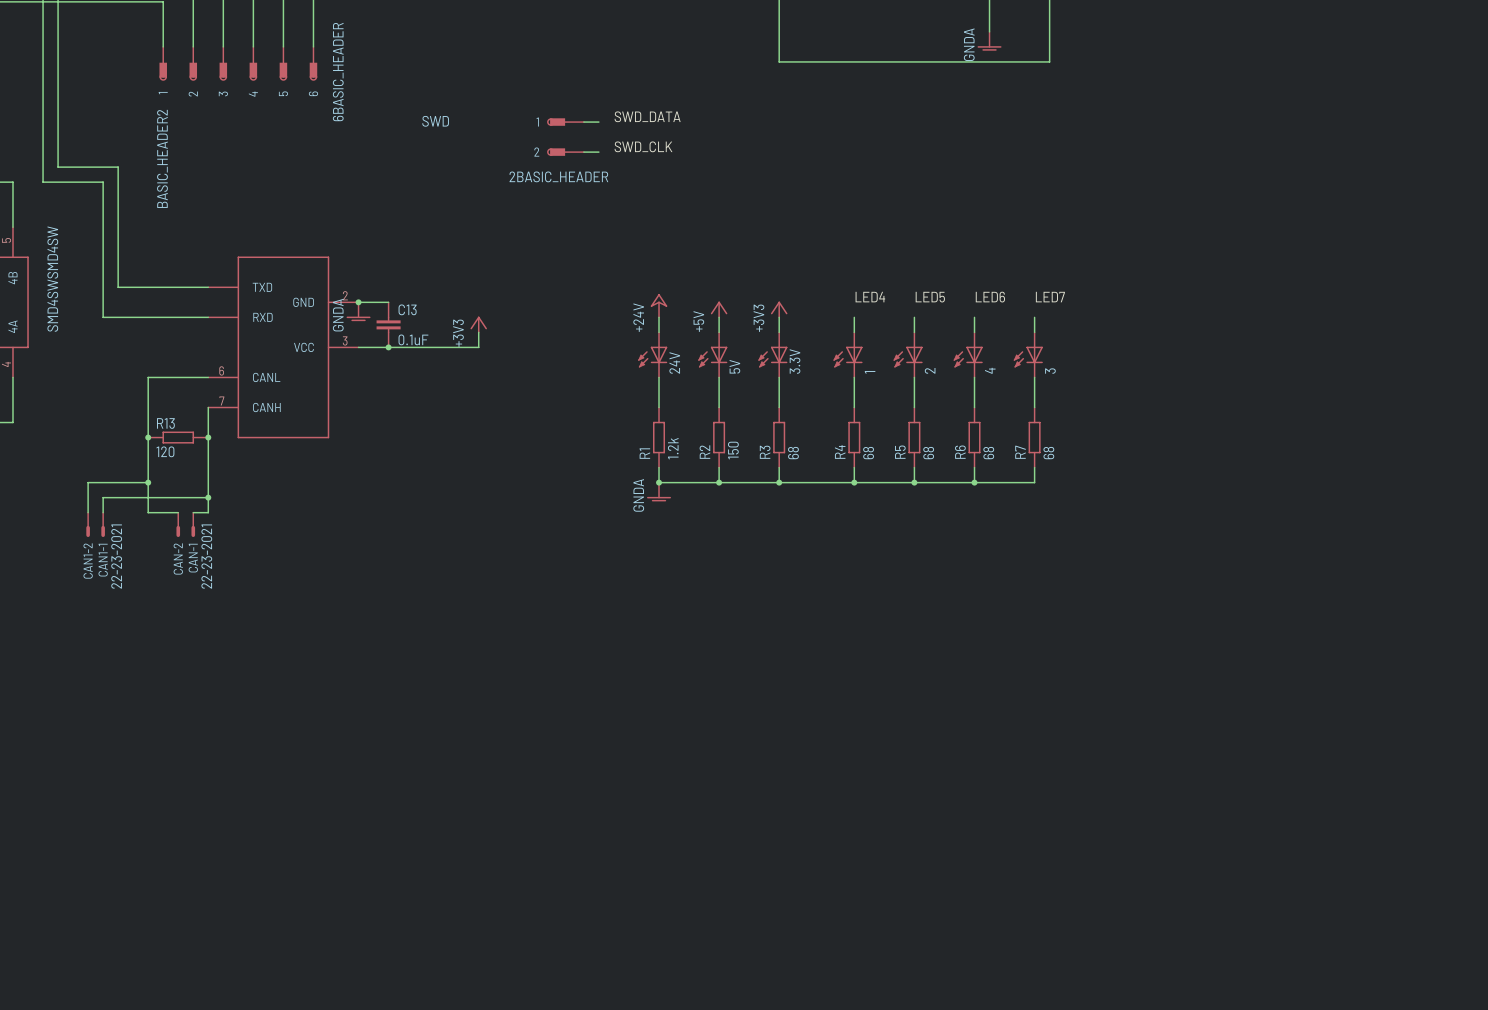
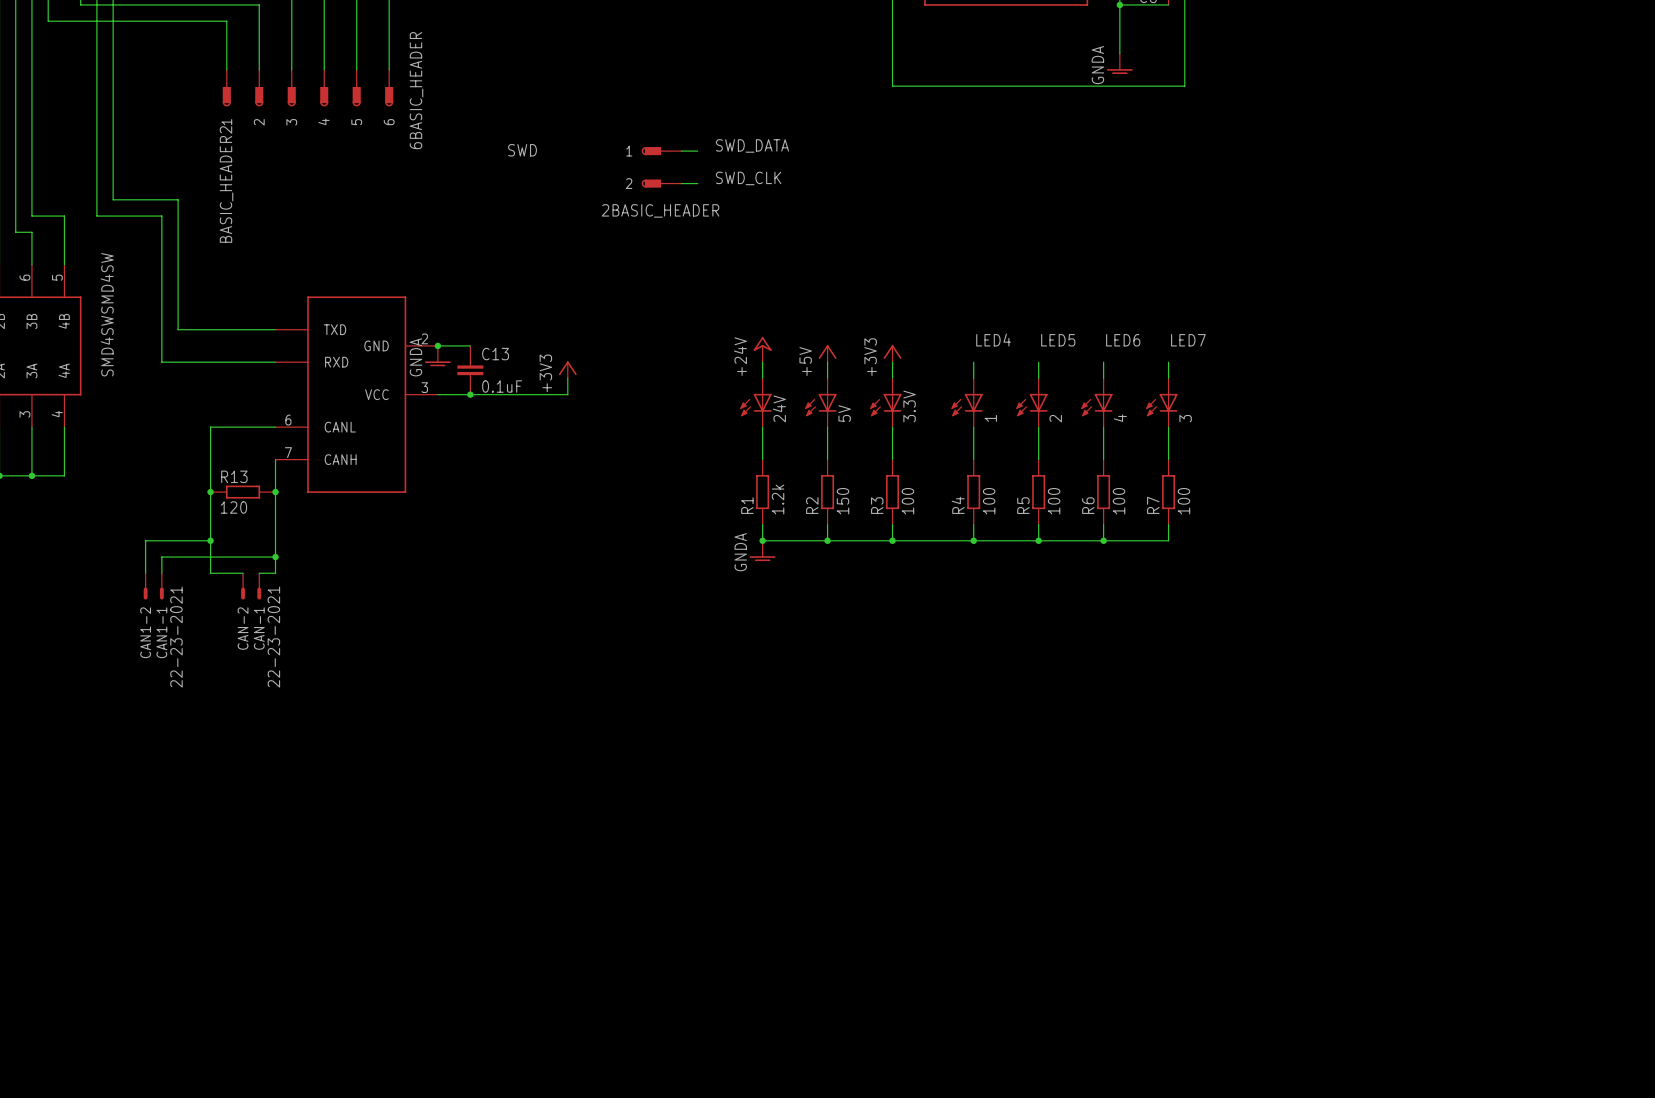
R3 value: 68 (793, 453) -> 100 (907, 501)
R4 value: 68 (868, 453) -> 100 (989, 501)
R5 value: 68 (928, 453) -> 100 (1054, 501)
R6 value: 68 (988, 453) -> 100 (1119, 501)
R7 value: 68 (1048, 453) -> 100 (1183, 501)

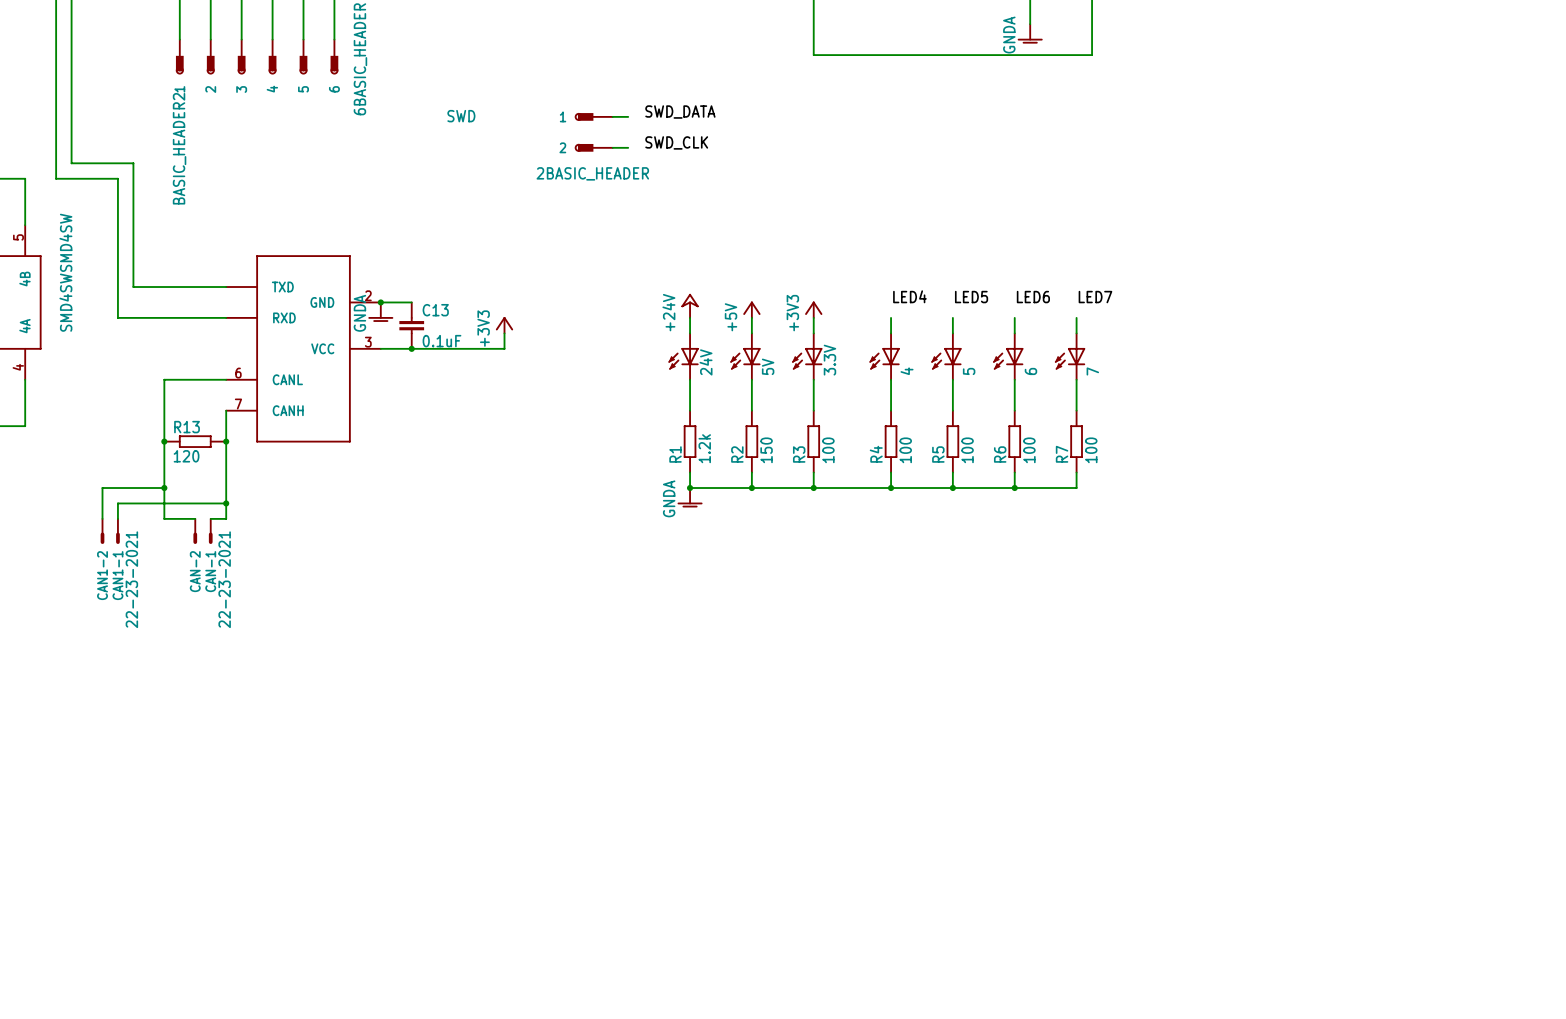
1 name: 1 (990, 418) -> 4 (907, 371)
2 name: 2 (1055, 418) -> 5 (969, 371)
4 name: 4 (1120, 418) -> 6 (1030, 371)
3 name: 3 (1185, 418) -> 7 (1092, 371)

